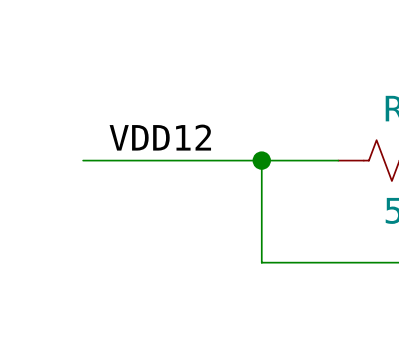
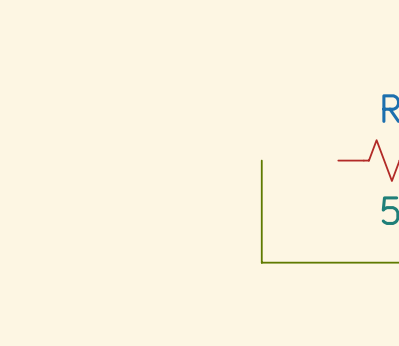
label: VDD12 (160, 137) -> none
wire: (83, 160) (338, 160) -> none
junction: (261, 160) -> none

